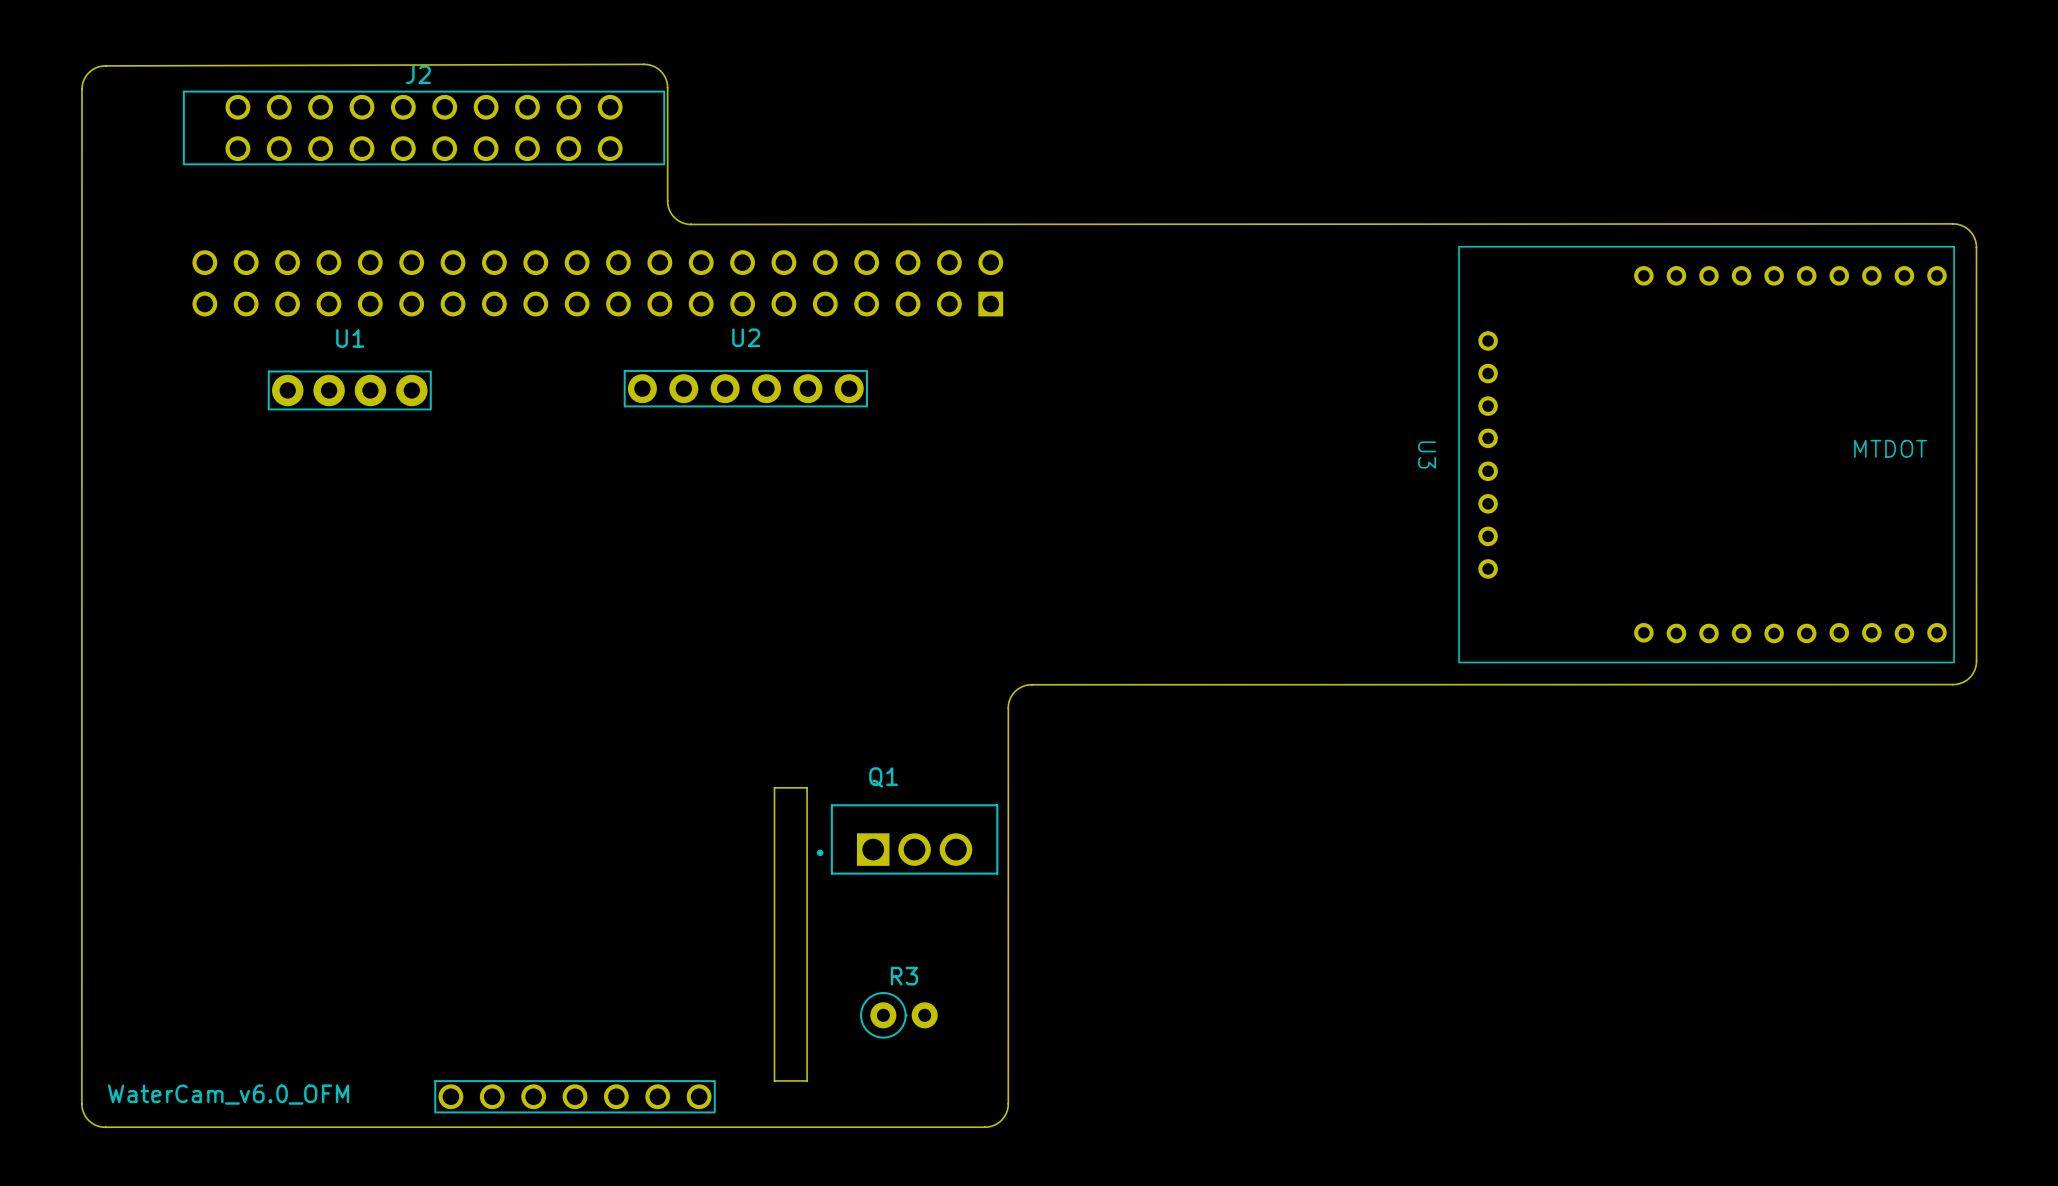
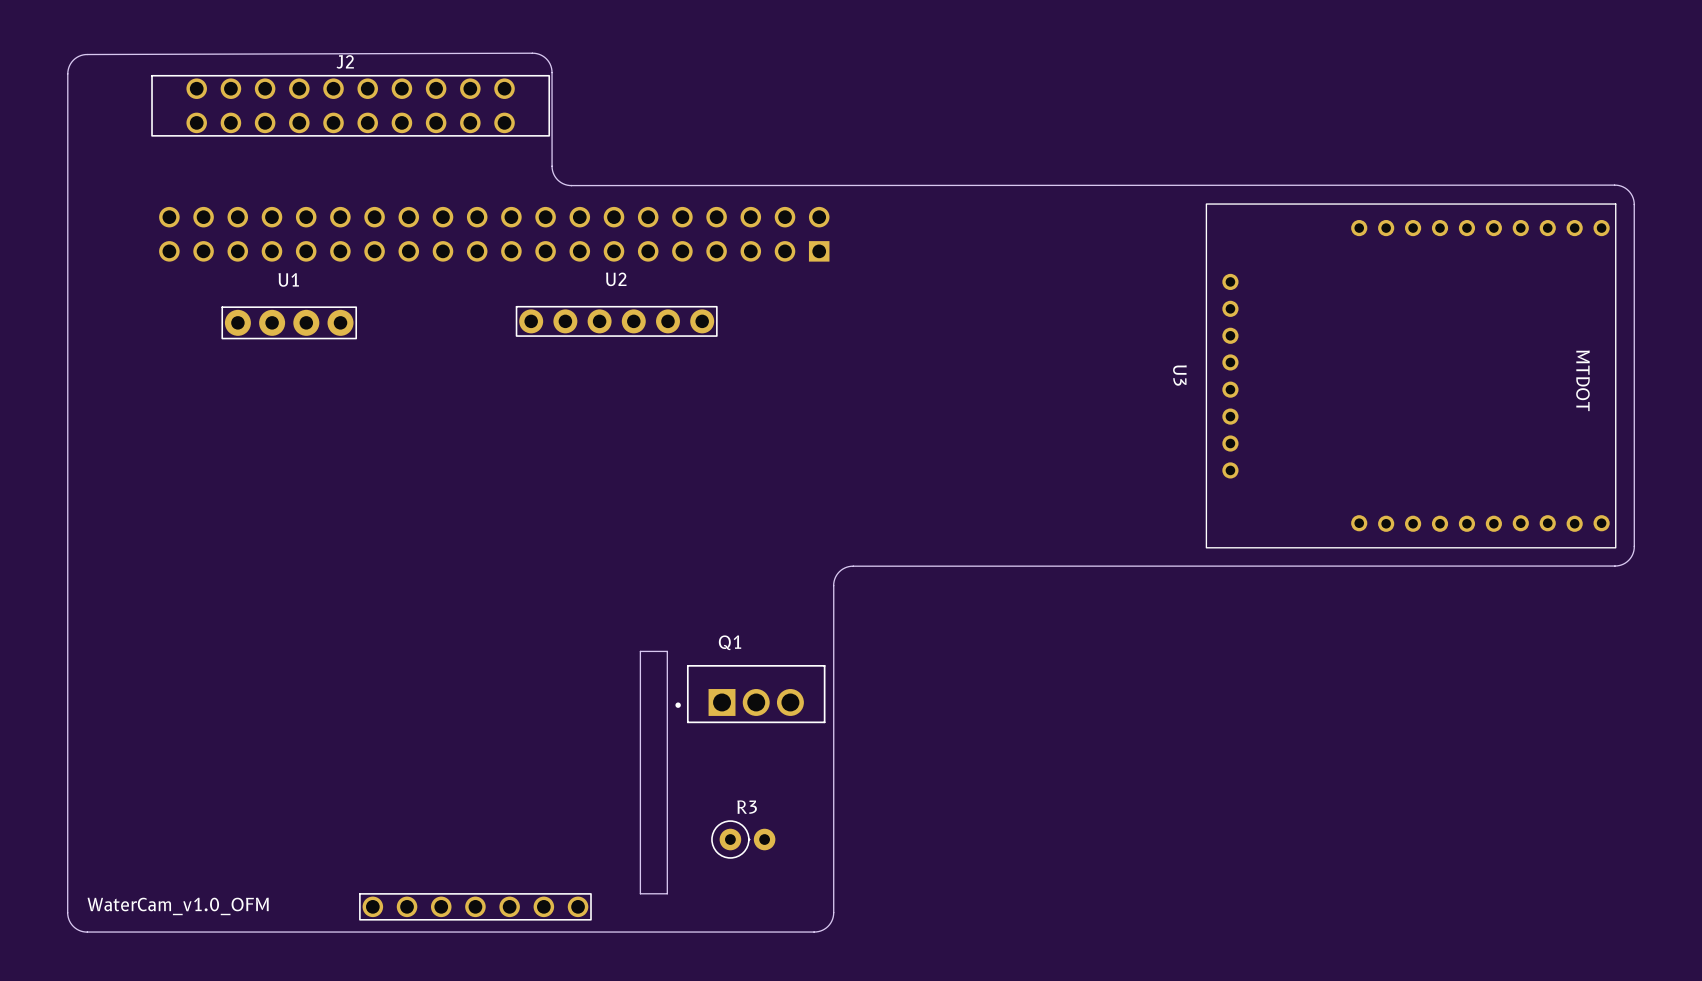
U3 text rotation: 0° (1890, 448) -> 90° clockwise (1582, 380)
text: WaterCam_v6.0_OFM (228, 1094) -> WaterCam_v1.0_OFM (178, 906)

